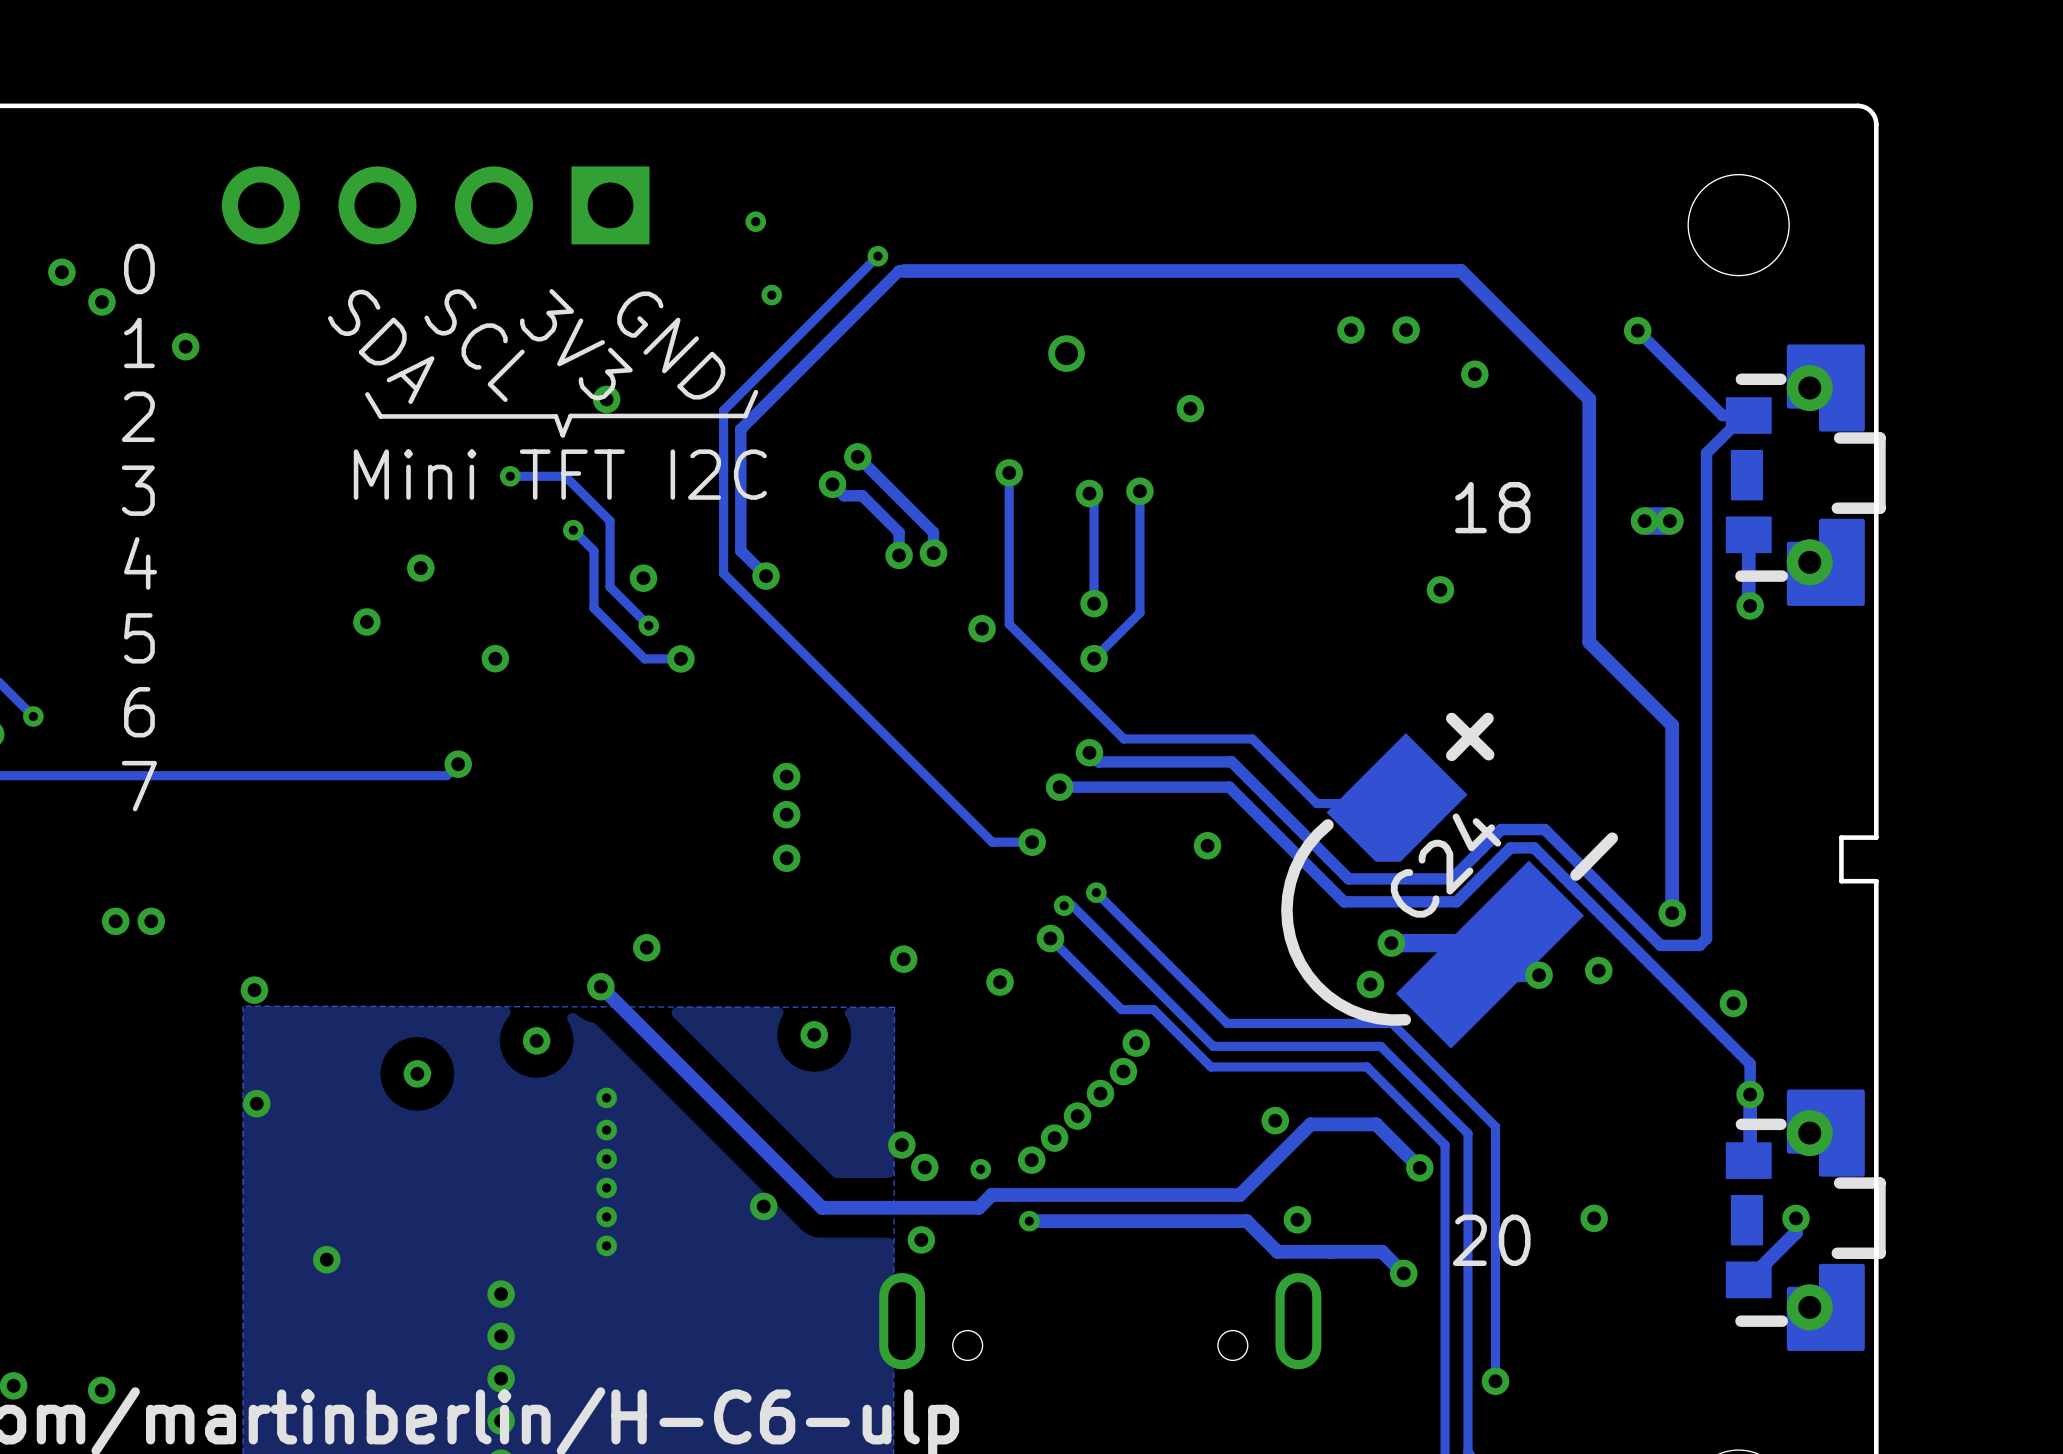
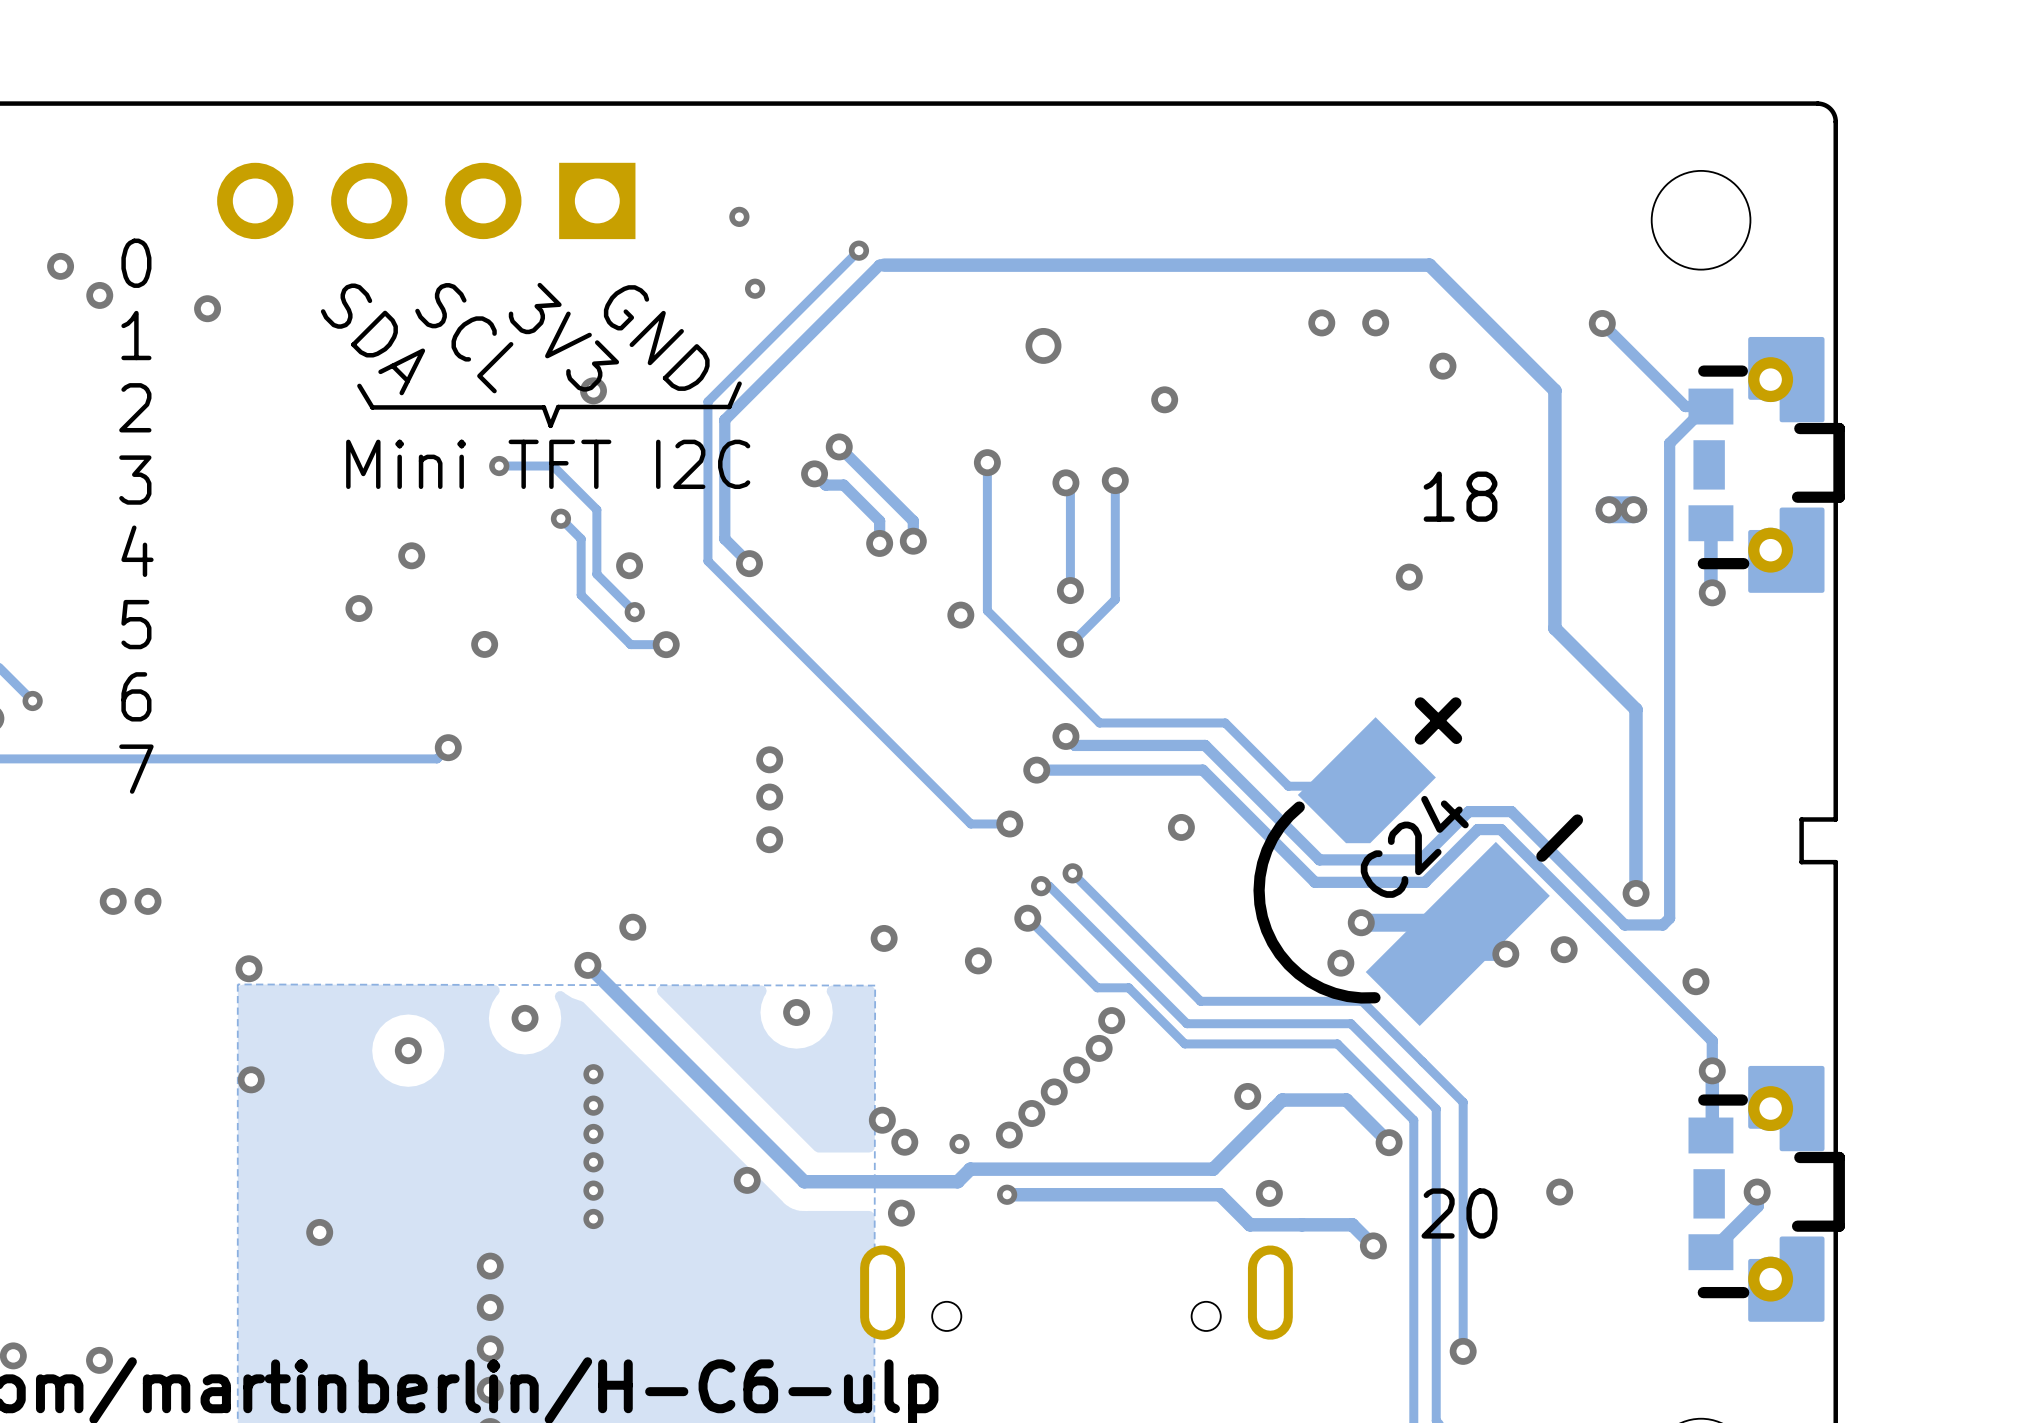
via position: (185, 346) -> (207, 308)

